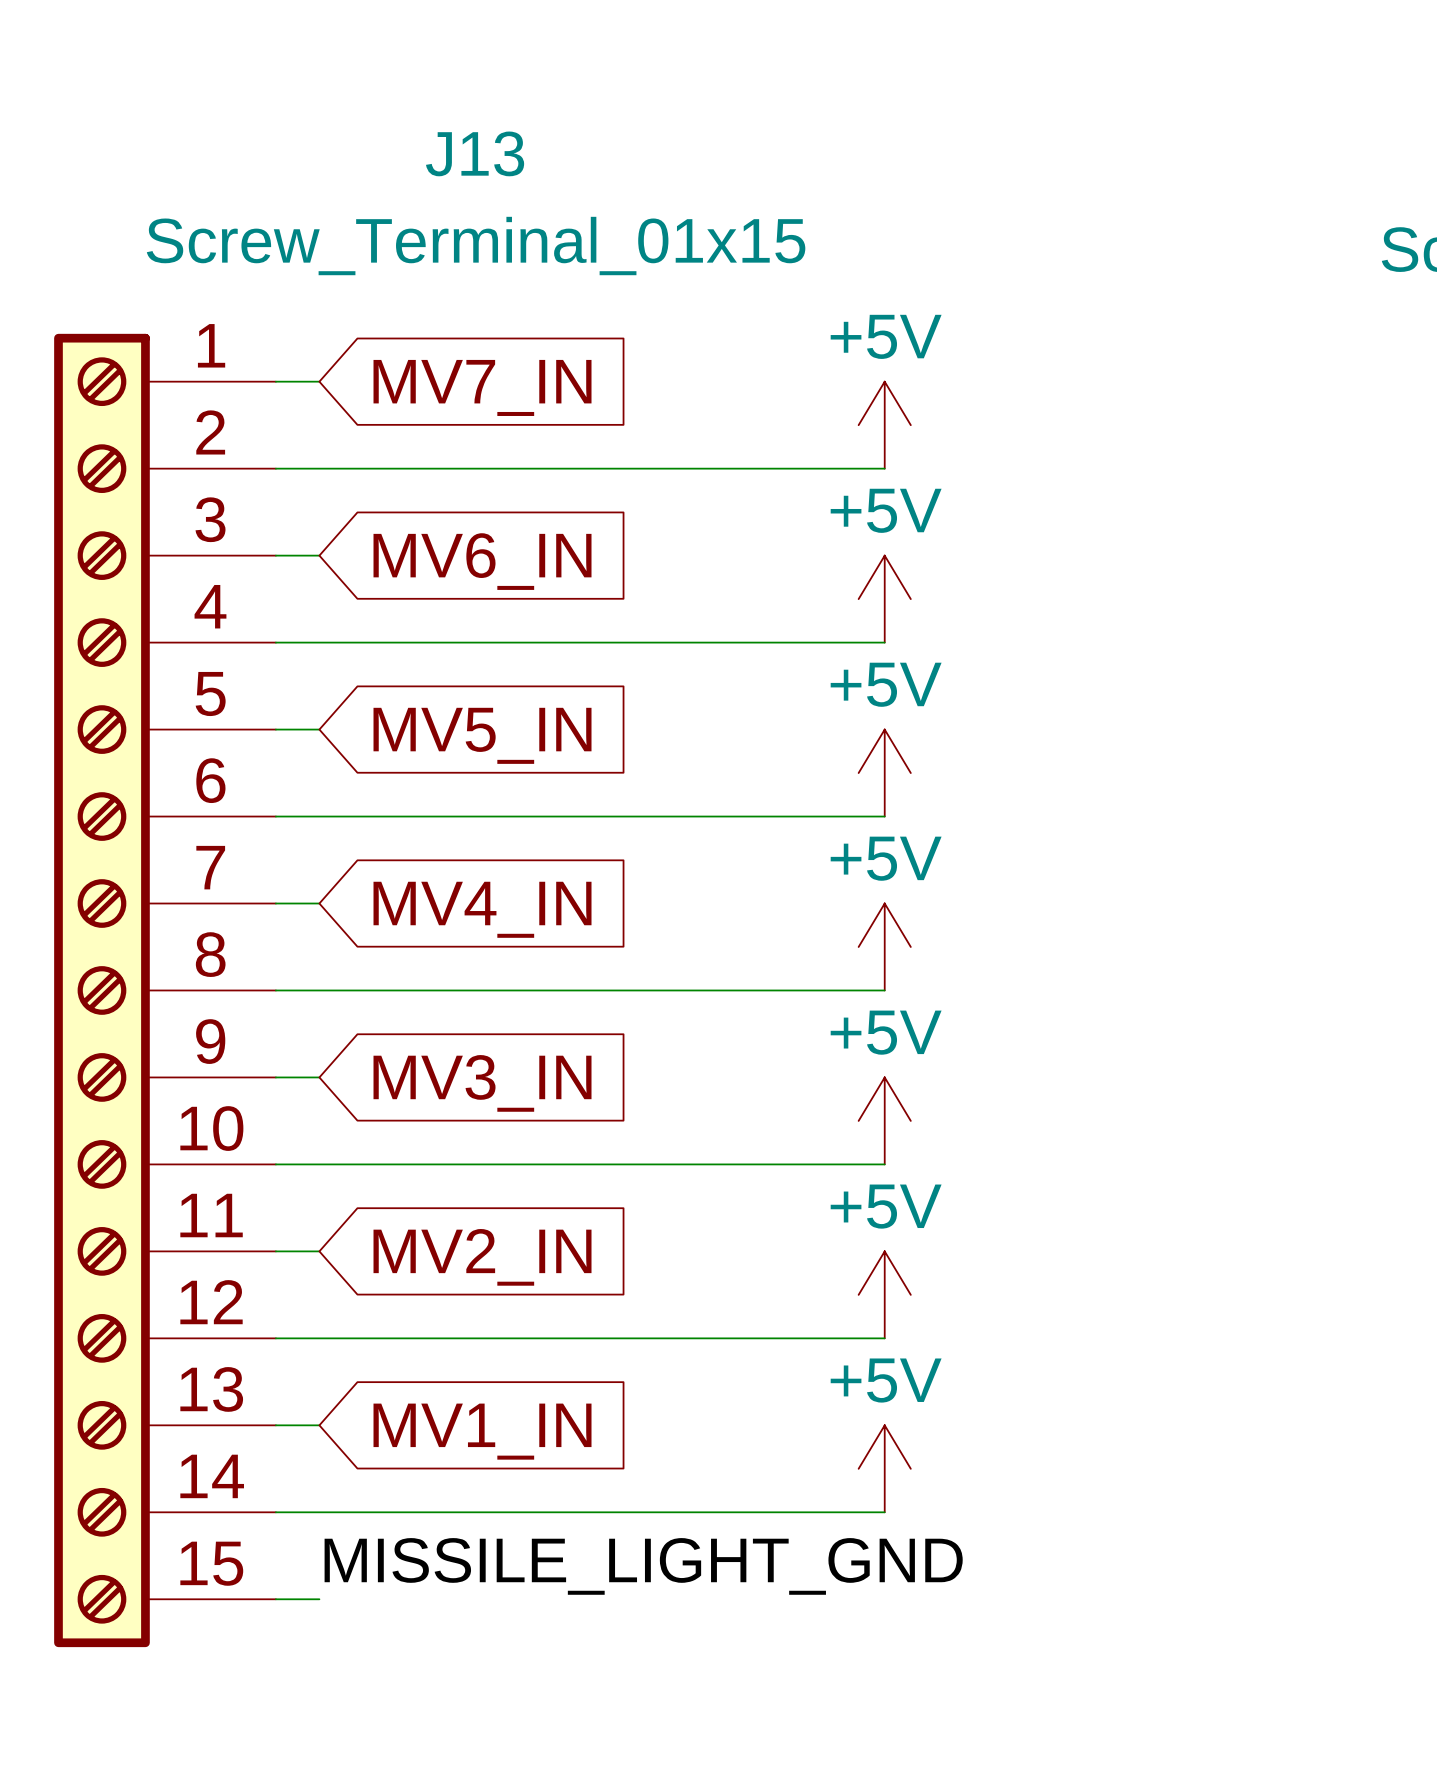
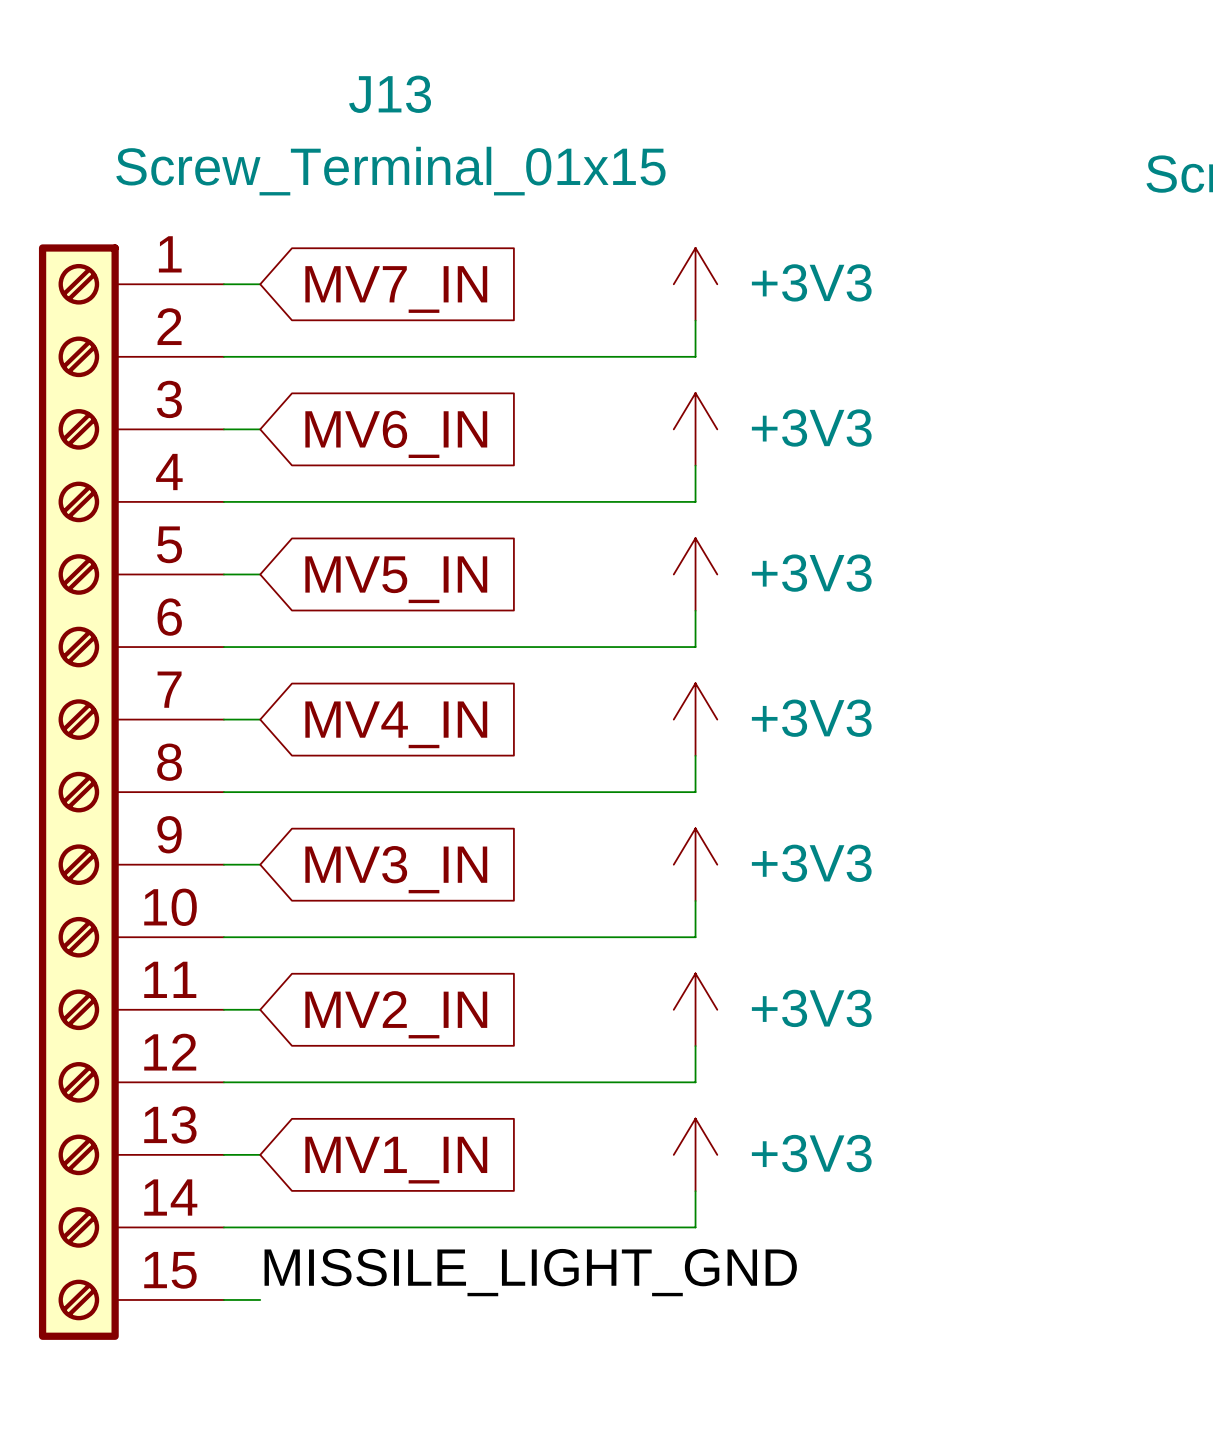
power symbol: none -> +3V3 (695, 284)
power symbol: +5V (884, 425) -> none
wire: (841, 468) (884, 468) -> (695, 356) (695, 320)
power symbol: none -> +3V3 (695, 429)
power symbol: +5V (884, 599) -> none
wire: (841, 642) (884, 642) -> (695, 501) (695, 465)
power symbol: none -> +3V3 (695, 574)
power symbol: +5V (884, 773) -> none
wire: (841, 816) (884, 816) -> (695, 647) (695, 610)
power symbol: none -> +3V3 (695, 719)
power symbol: +5V (884, 946) -> none
wire: (841, 990) (884, 990) -> (695, 792) (695, 755)
power symbol: none -> +3V3 (695, 864)
power symbol: +5V (884, 1120) -> none
wire: (841, 1164) (884, 1164) -> (695, 937) (695, 900)
power symbol: none -> +3V3 (695, 1009)
power symbol: +5V (884, 1294) -> none
wire: (841, 1338) (884, 1338) -> (695, 1082) (695, 1046)
power symbol: none -> +3V3 (695, 1154)
power symbol: +5V (884, 1468) -> none
wire: (841, 1512) (884, 1512) -> (695, 1227) (695, 1191)

